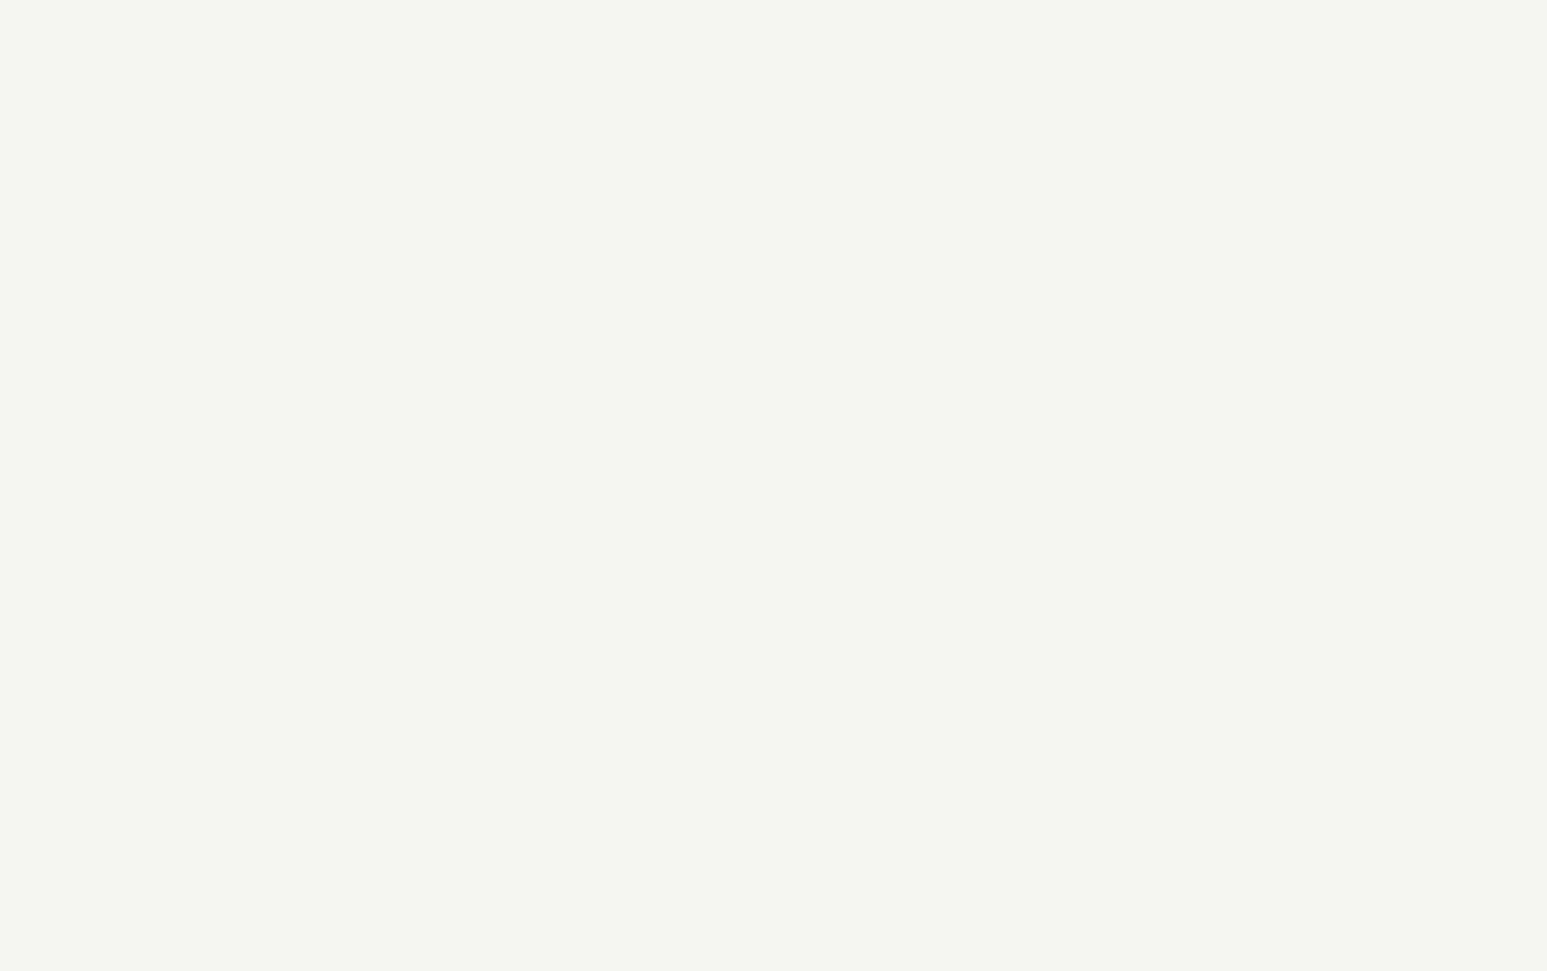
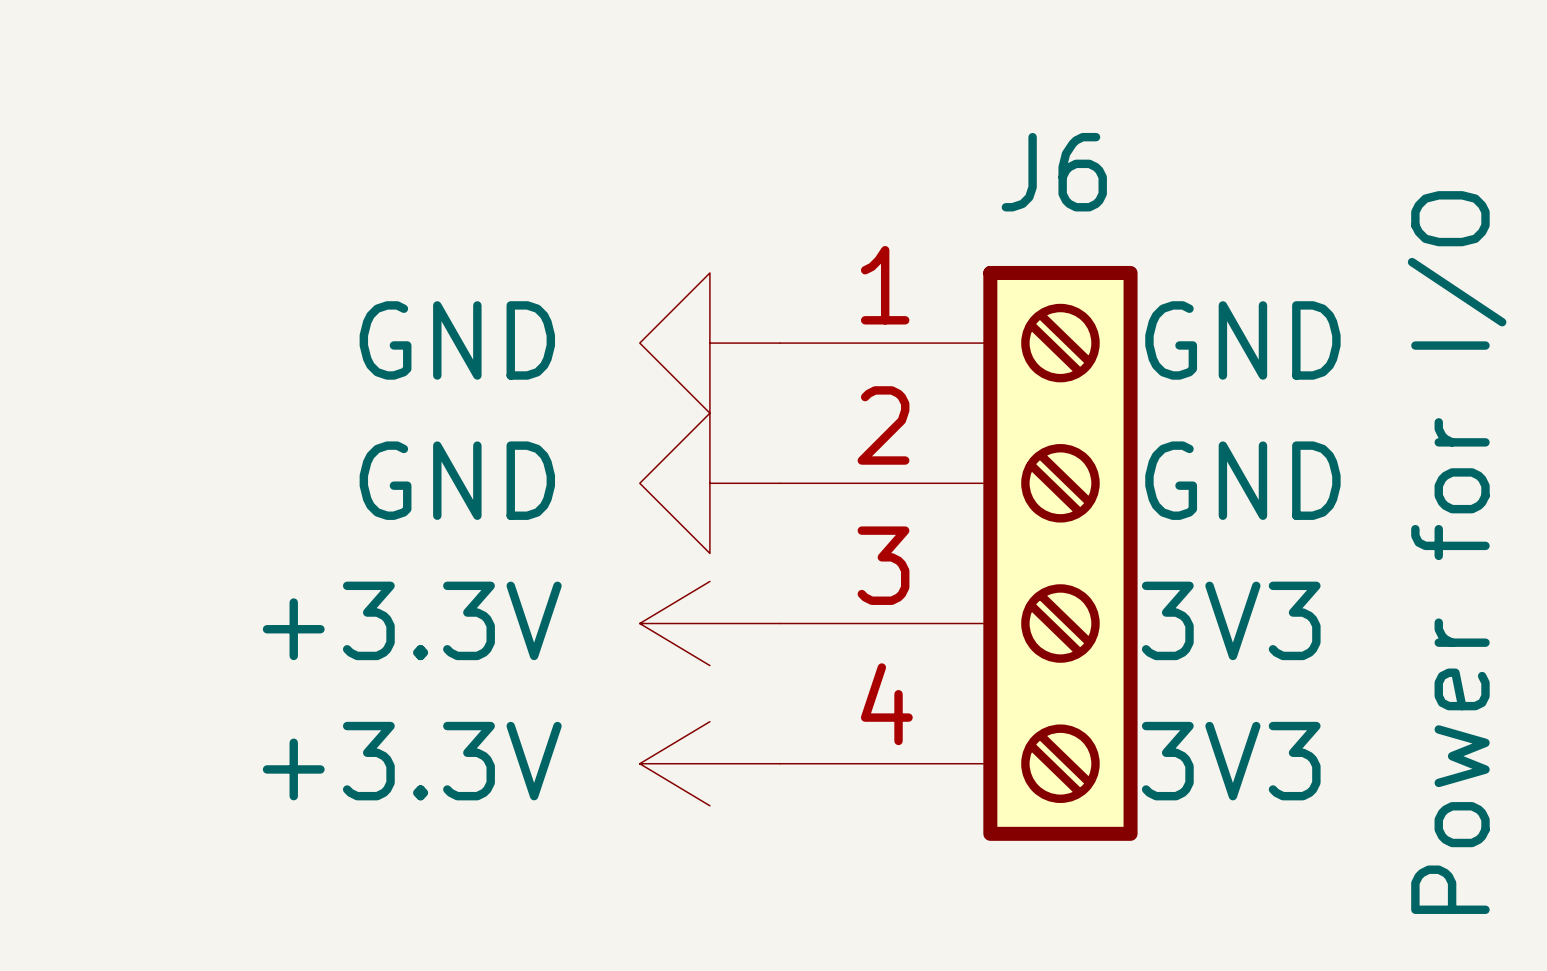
power symbol: none -> GND (709, 343)
power symbol: none -> GND (709, 483)
J6: none -> Power for I/O (958, 553)
power symbol: none -> +3.3V (709, 623)
power symbol: none -> +3.3V (709, 763)

